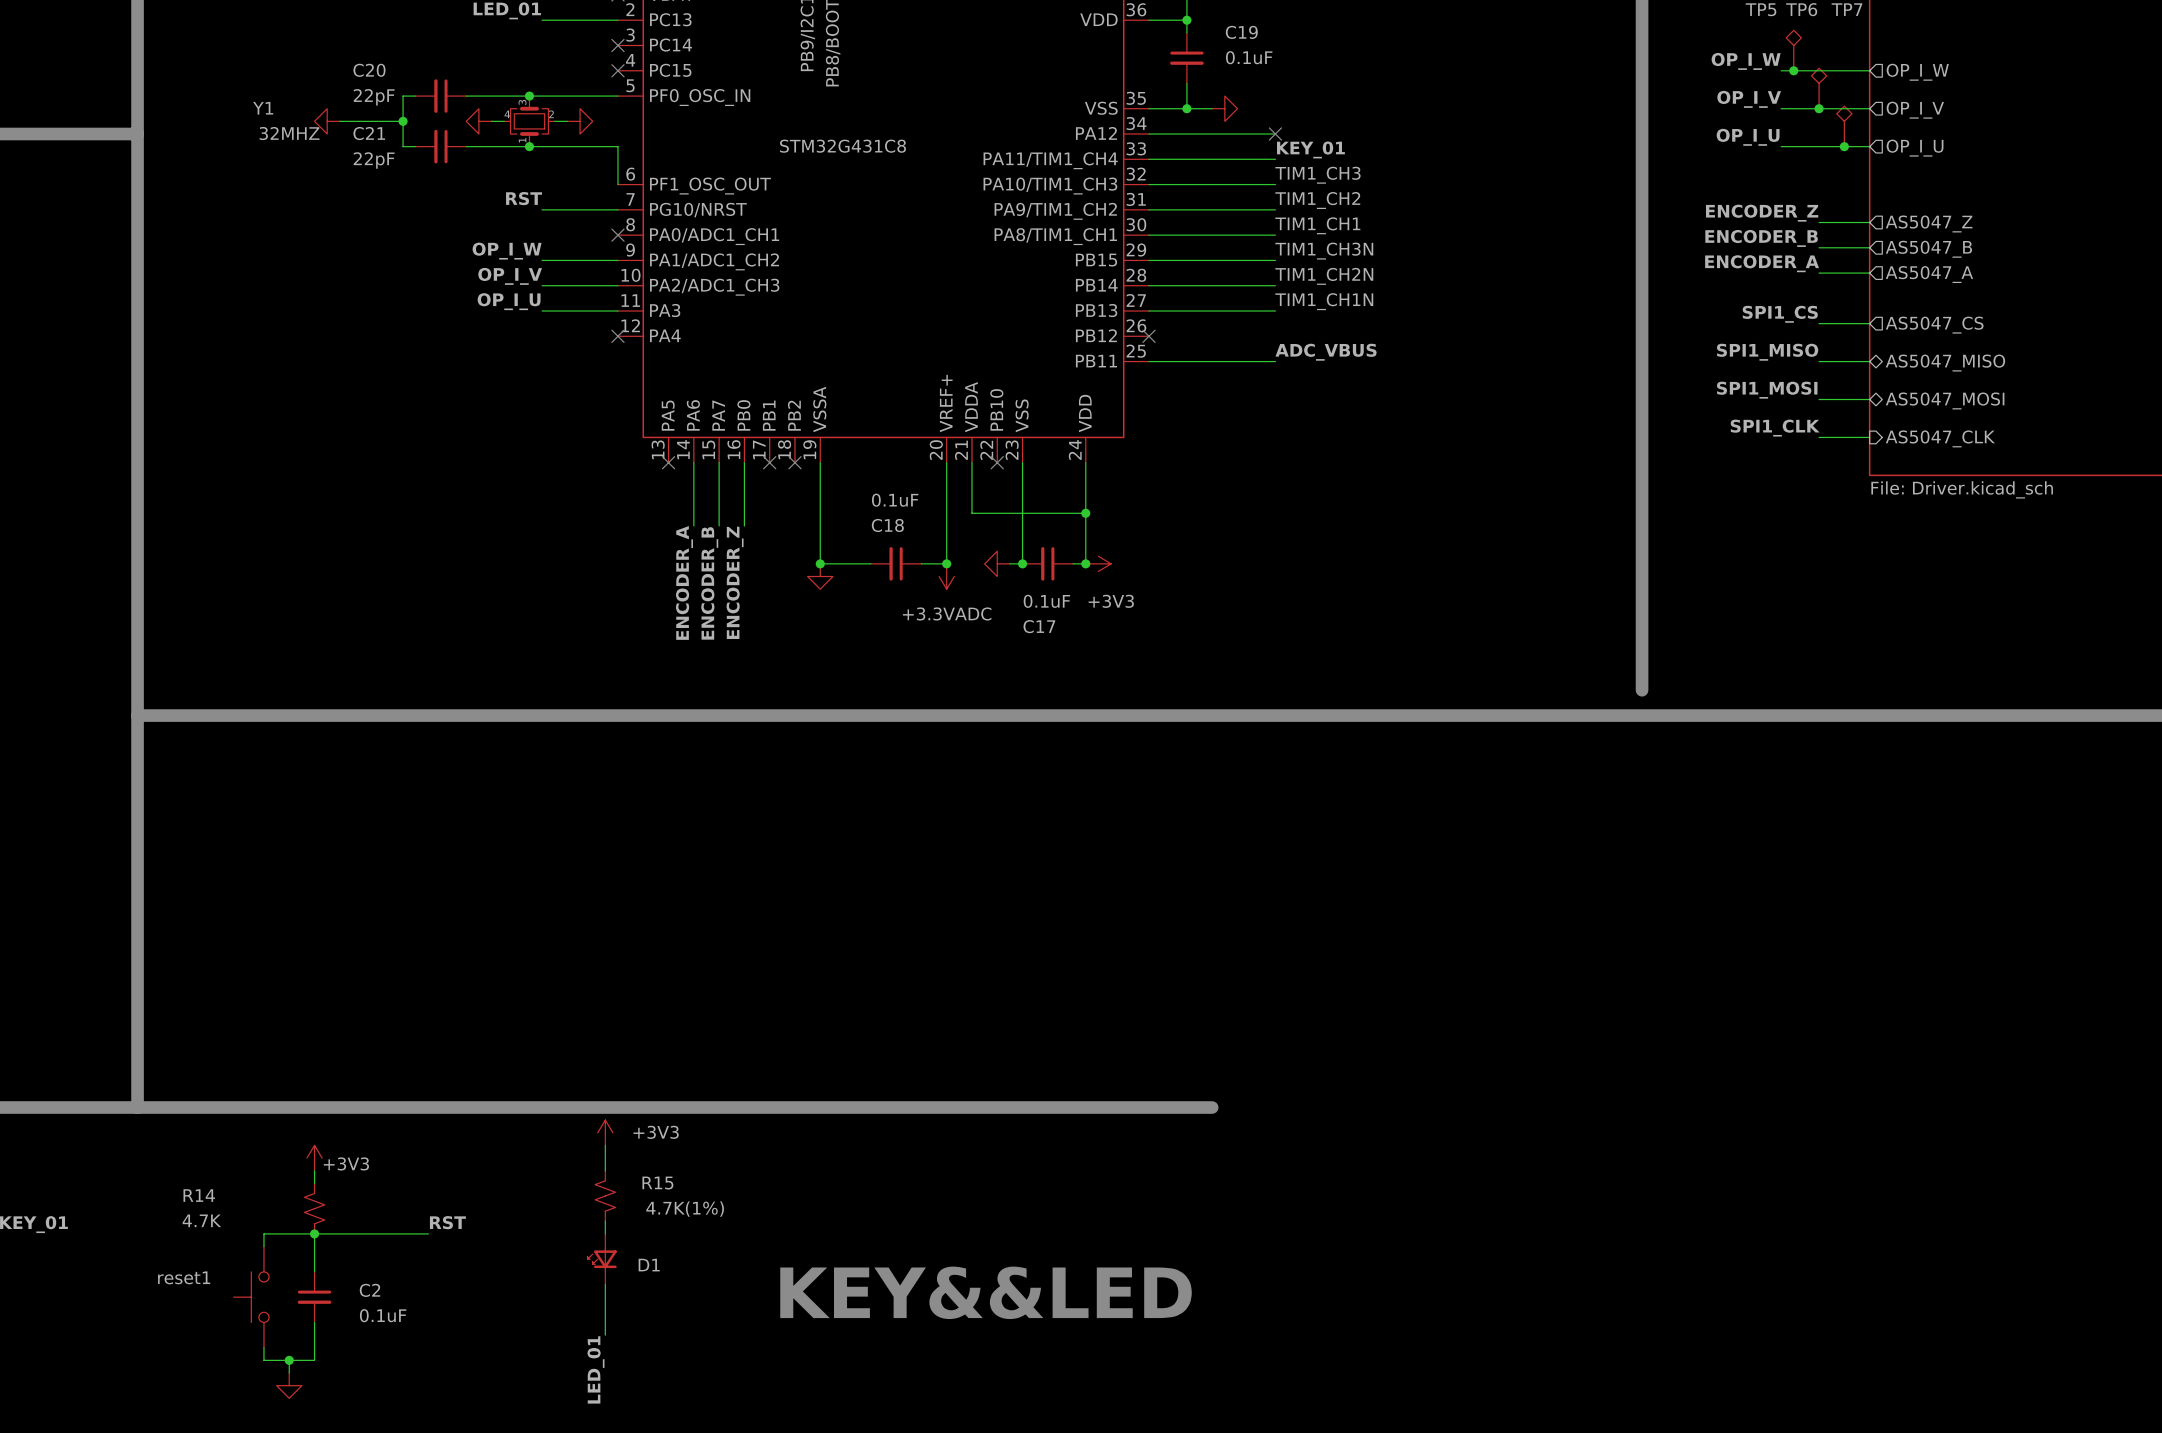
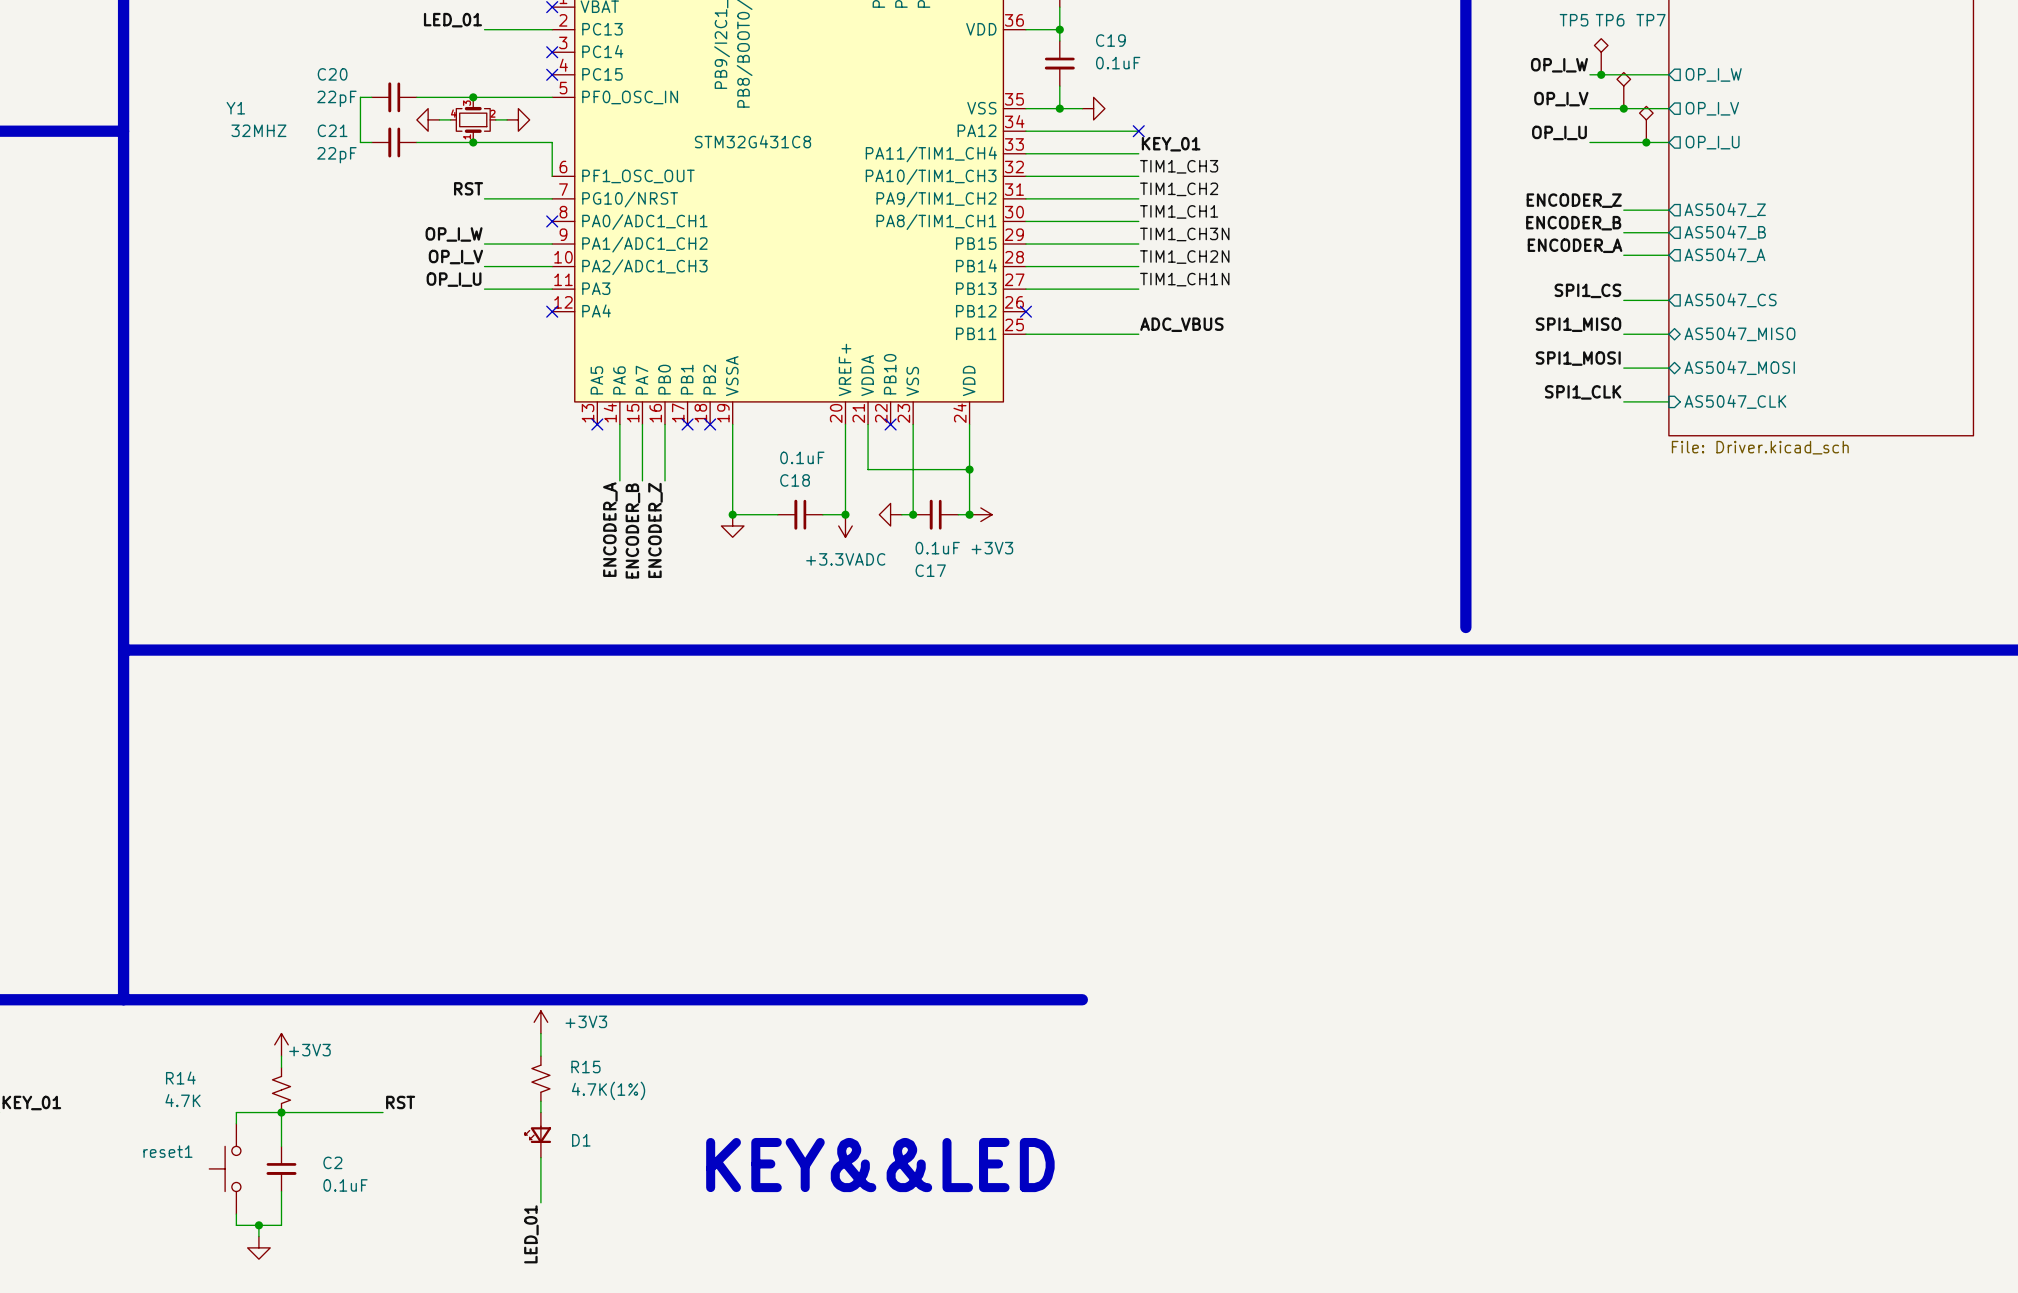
power symbol: (327, 121) -> none
wire: (339, 121) (403, 121) -> none
junction: (403, 121) -> none

